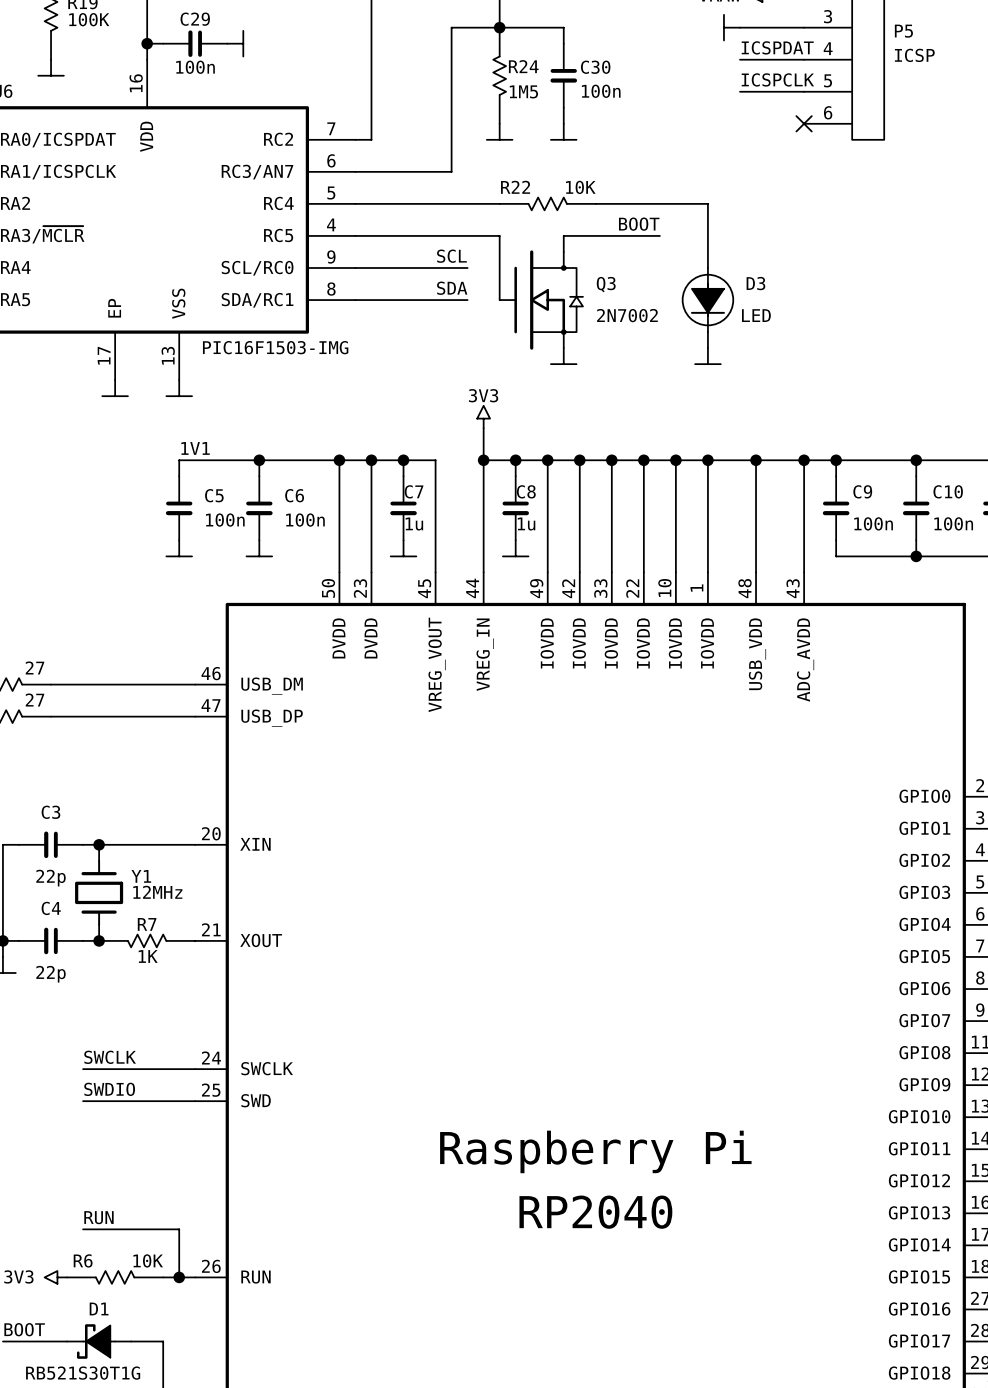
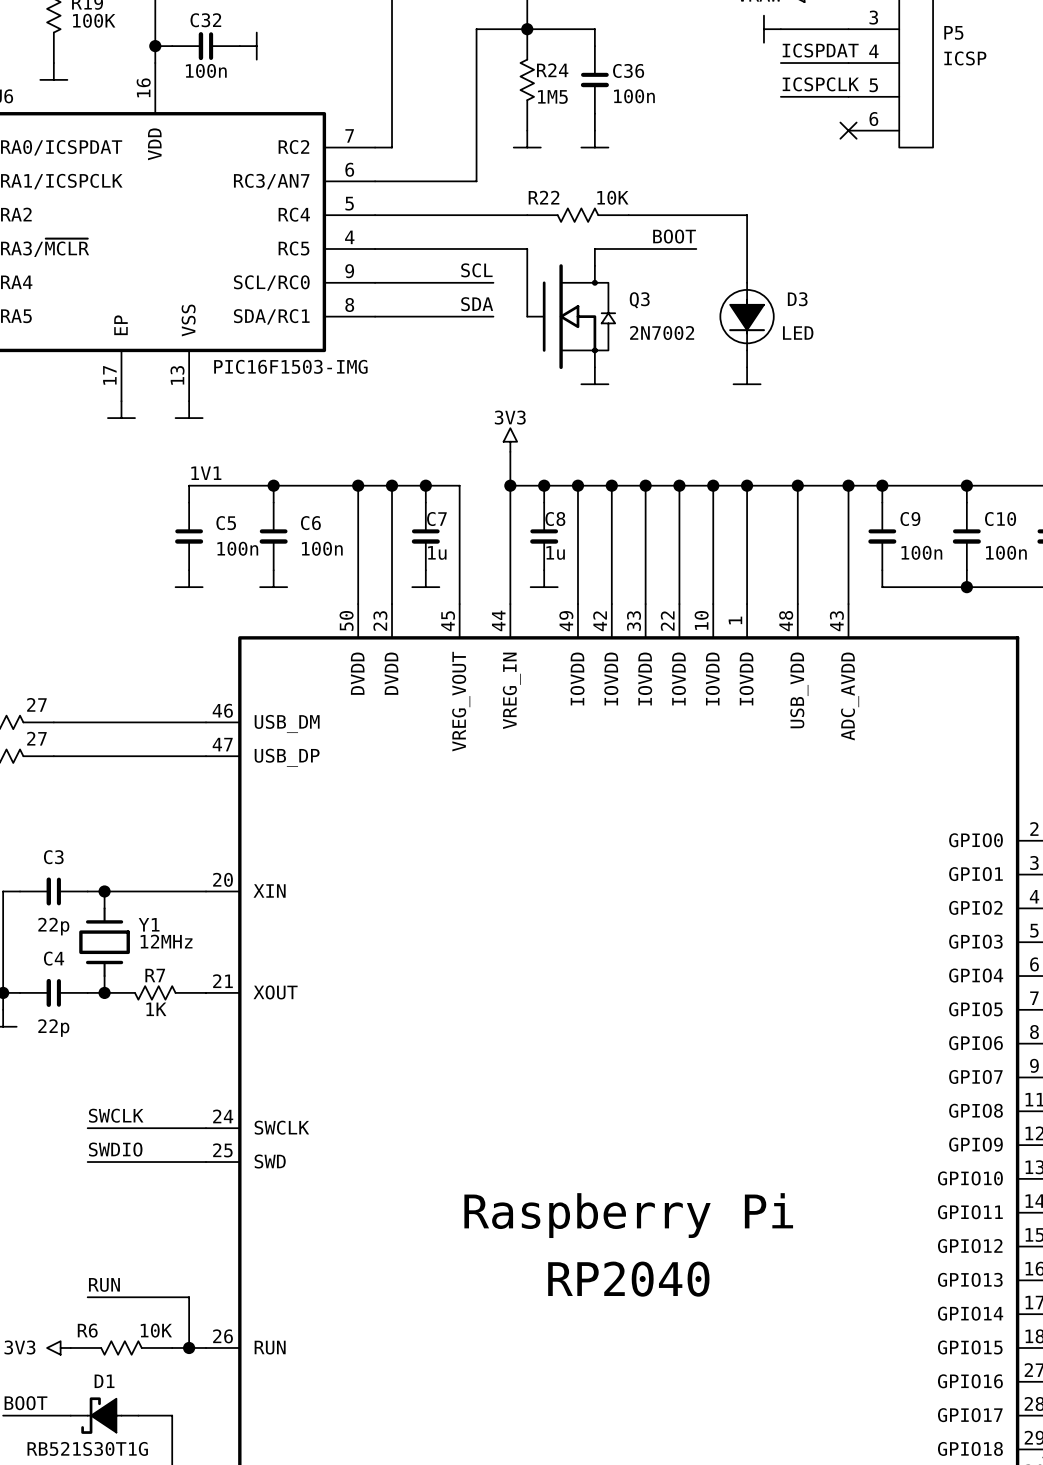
C29 name: C29 (195, 19) -> C32 (205, 20)
C30 name: C30 (595, 67) -> C36 (628, 70)

